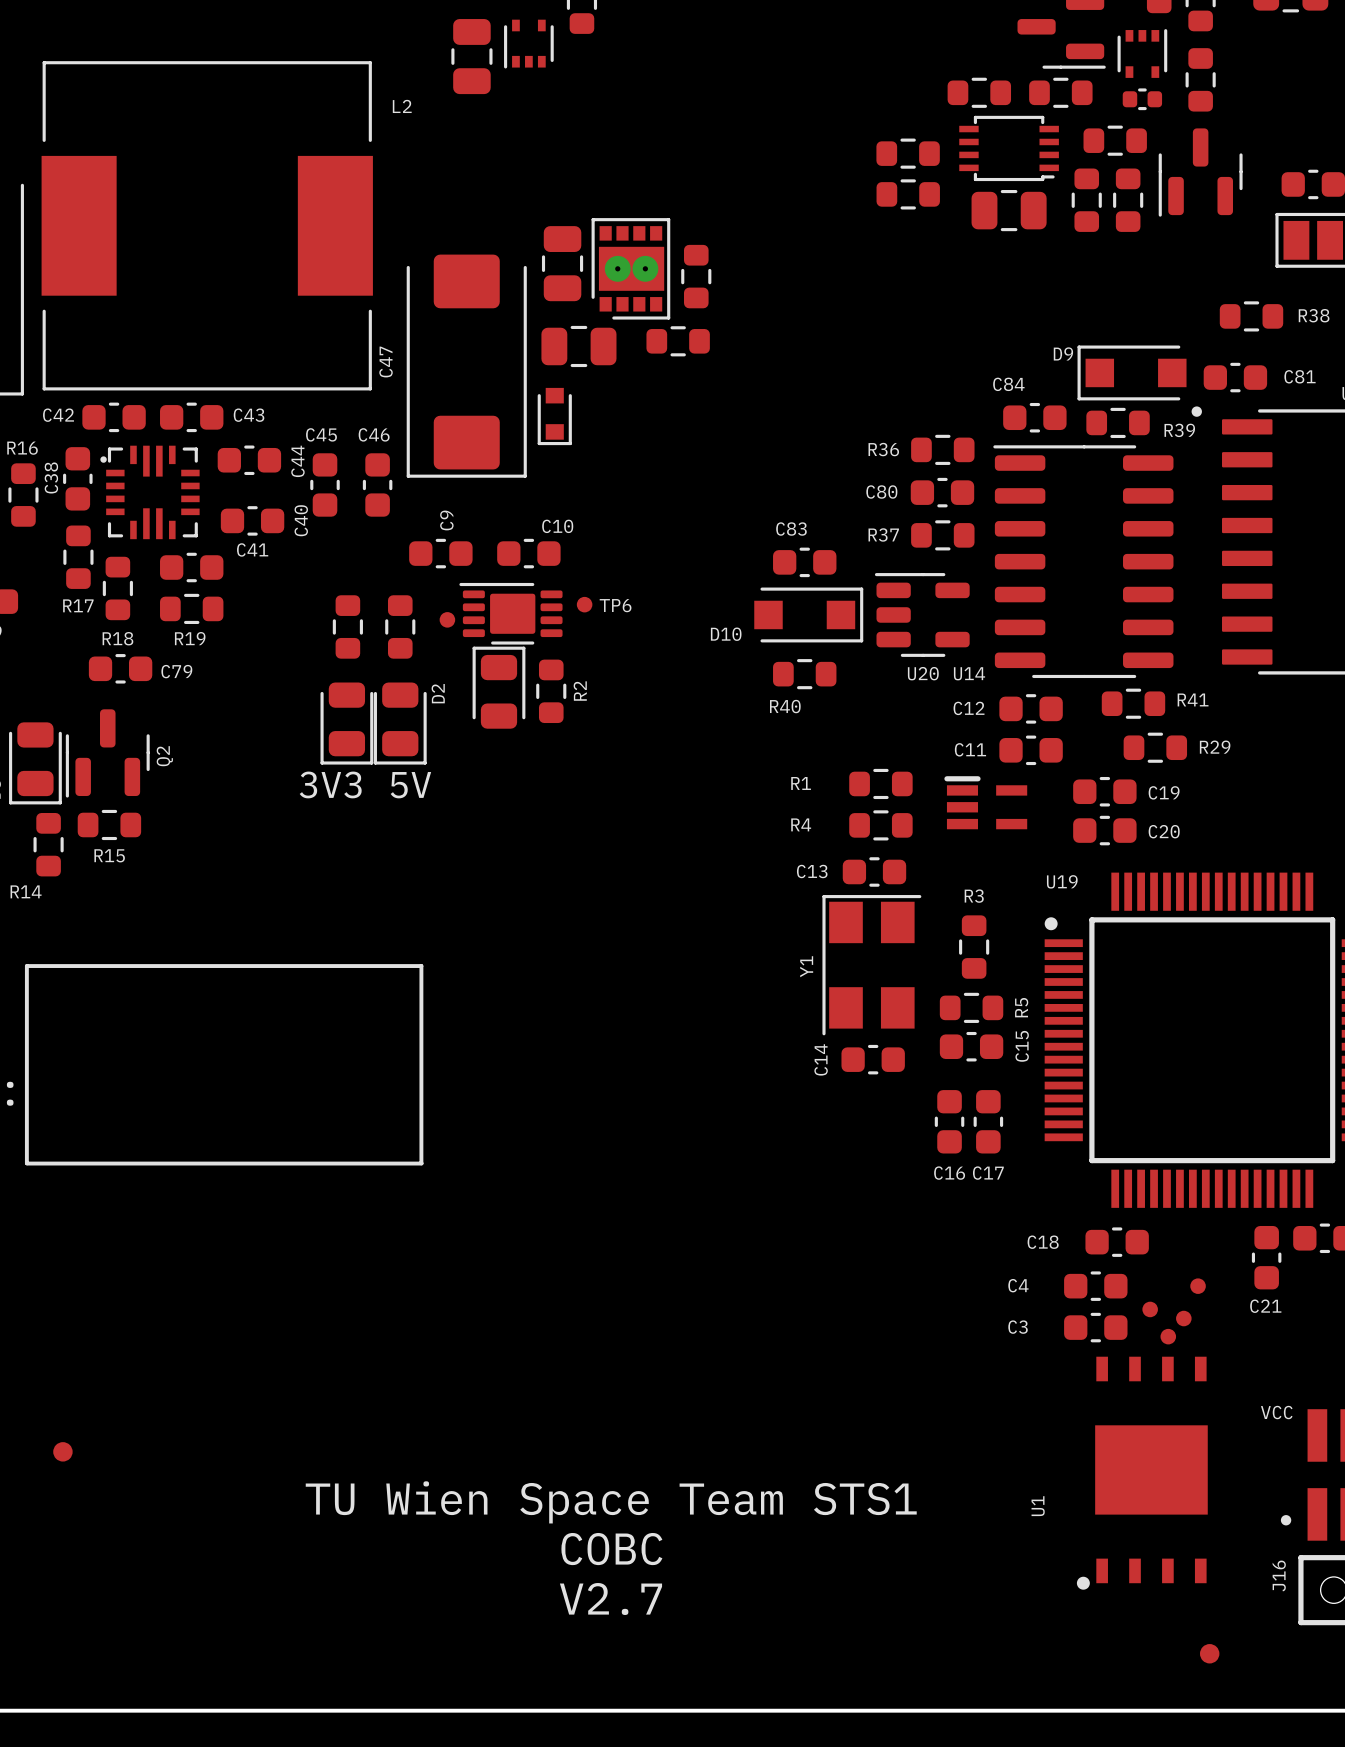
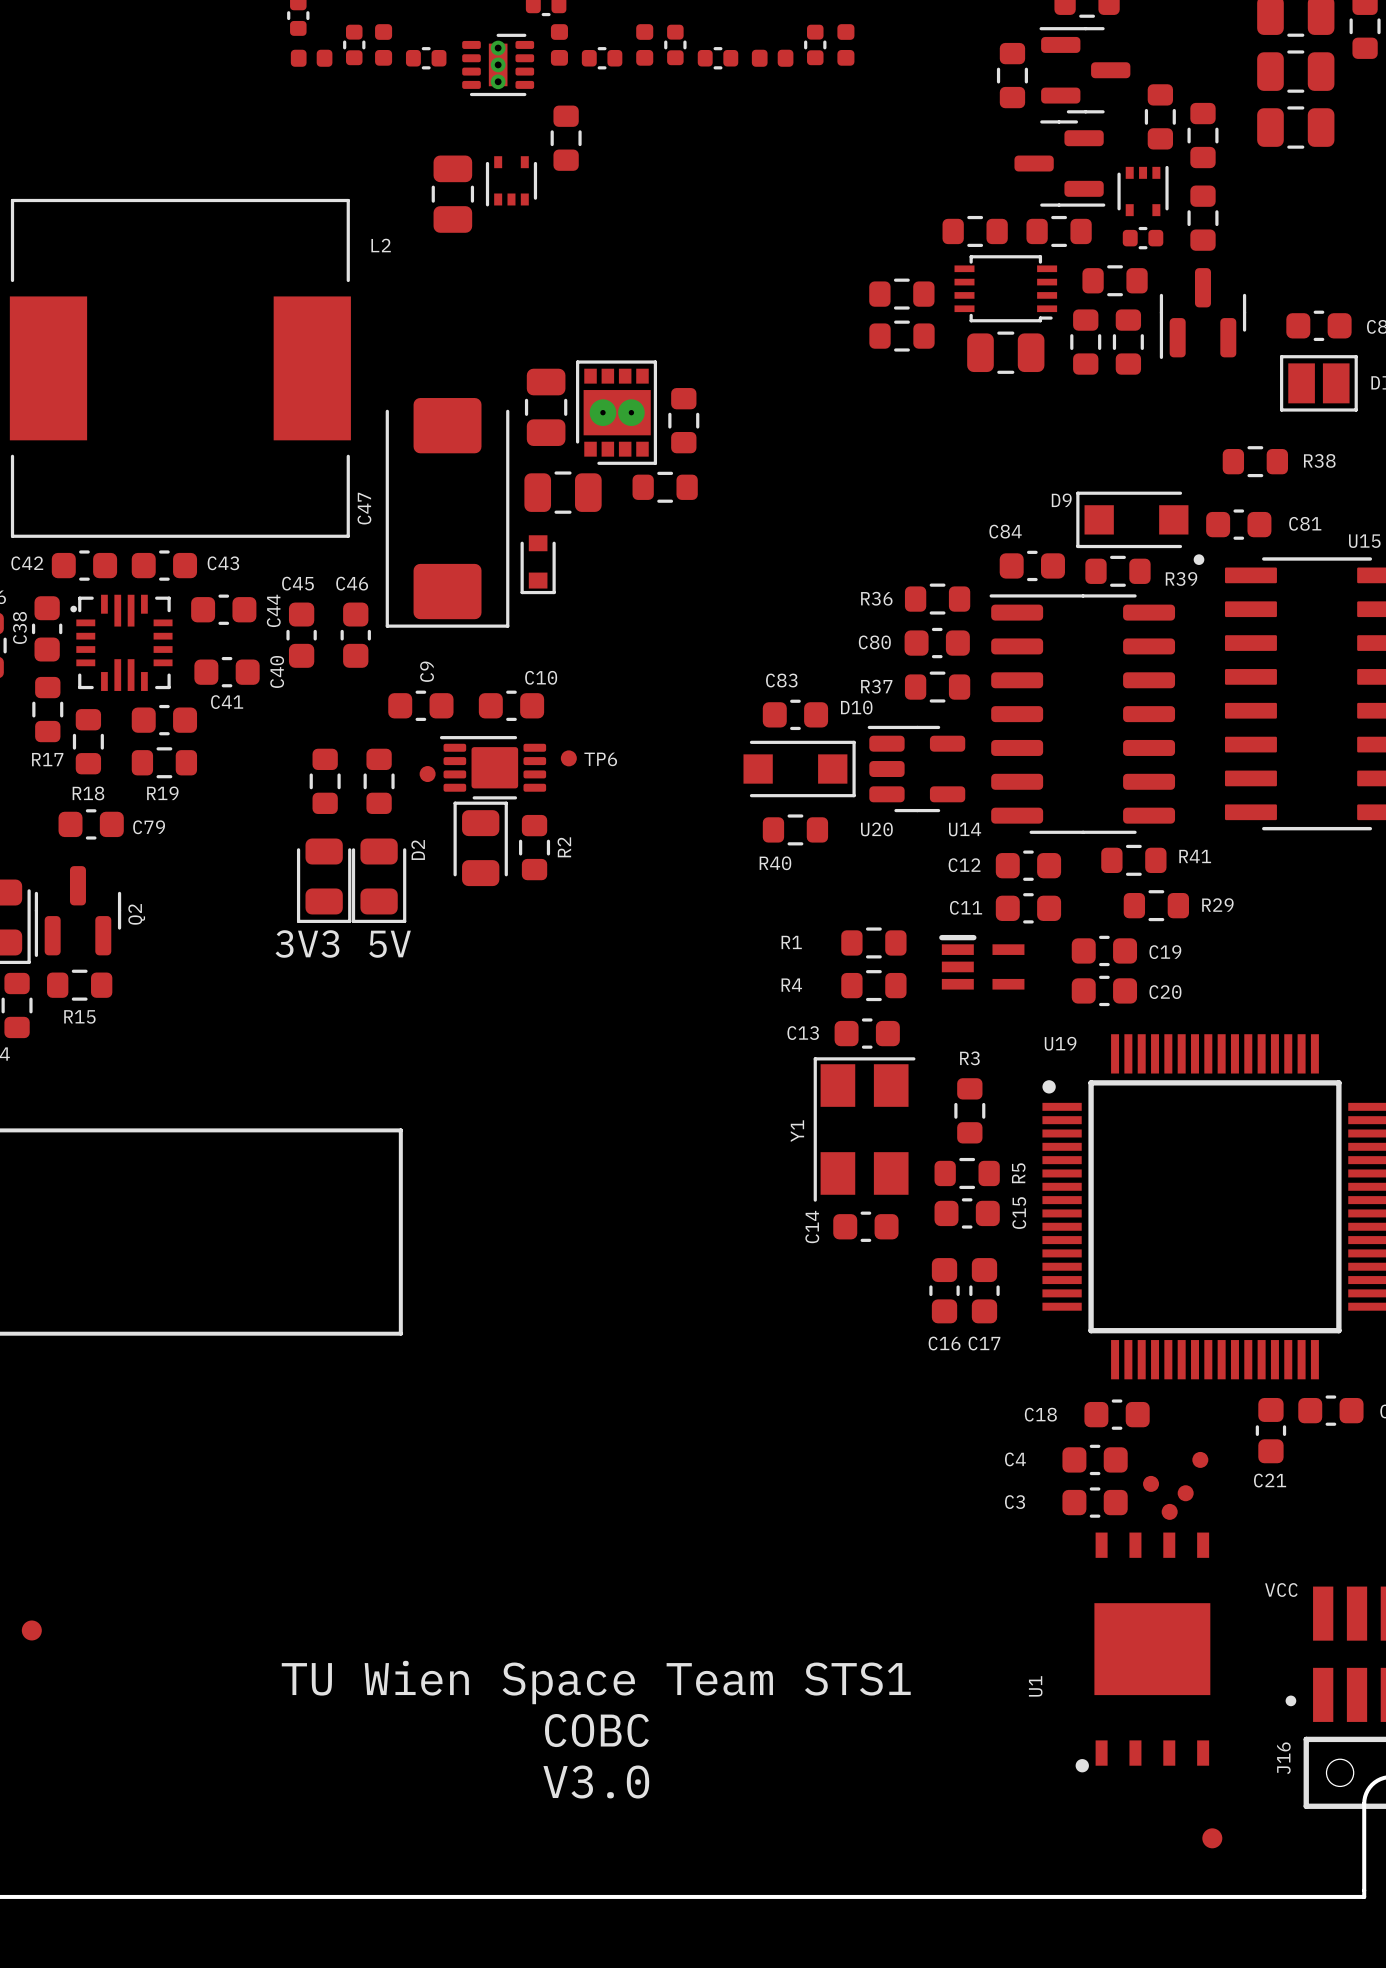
D10 name position: D10 (726, 634) -> D10 (856, 707)
U20 name position: U20 (923, 673) -> U20 (876, 829)
text: V2.7 (610, 1598) -> V3.0 (596, 1782)

